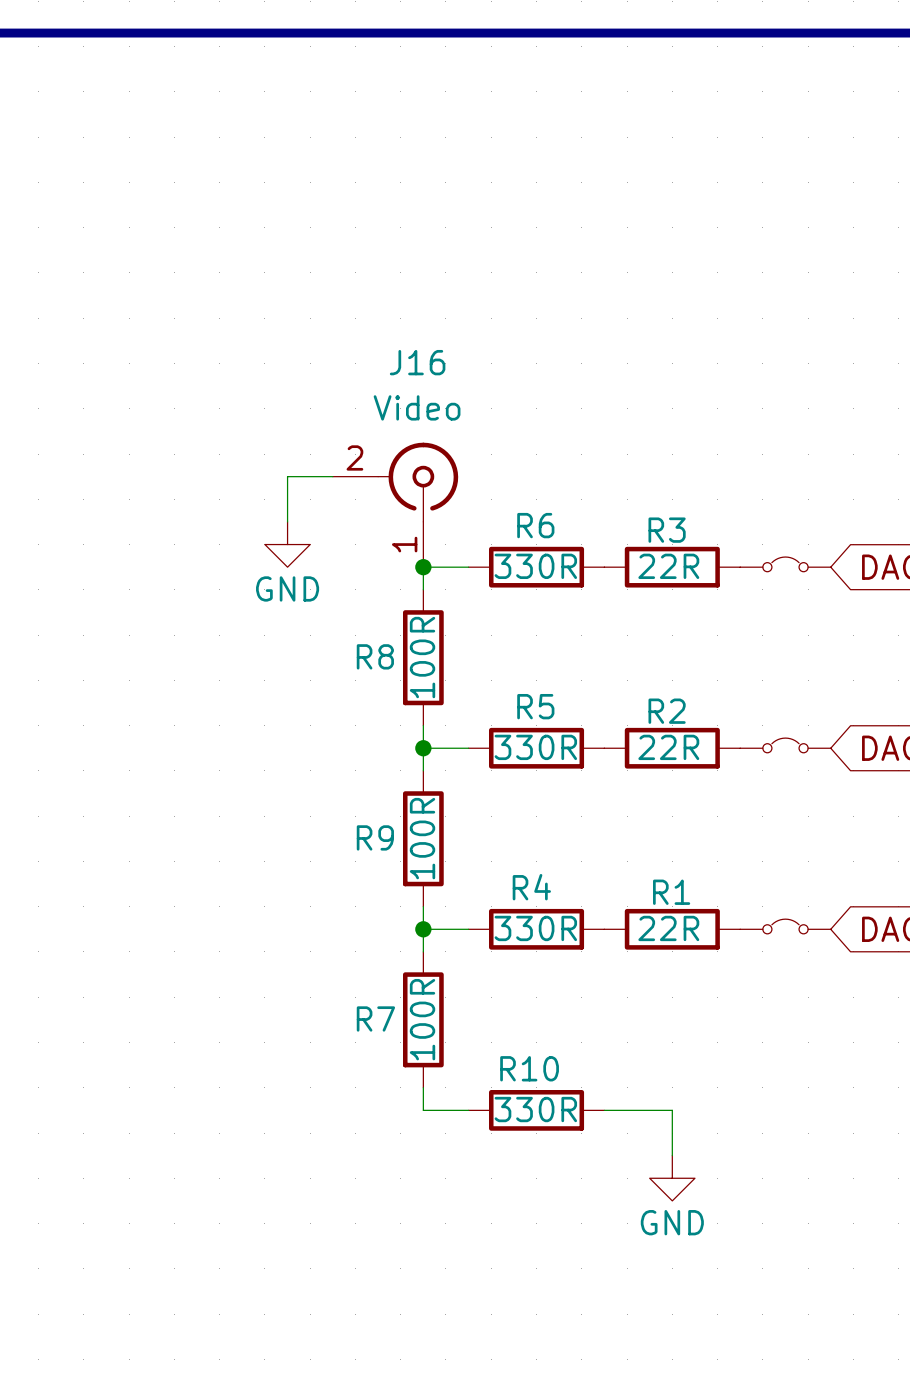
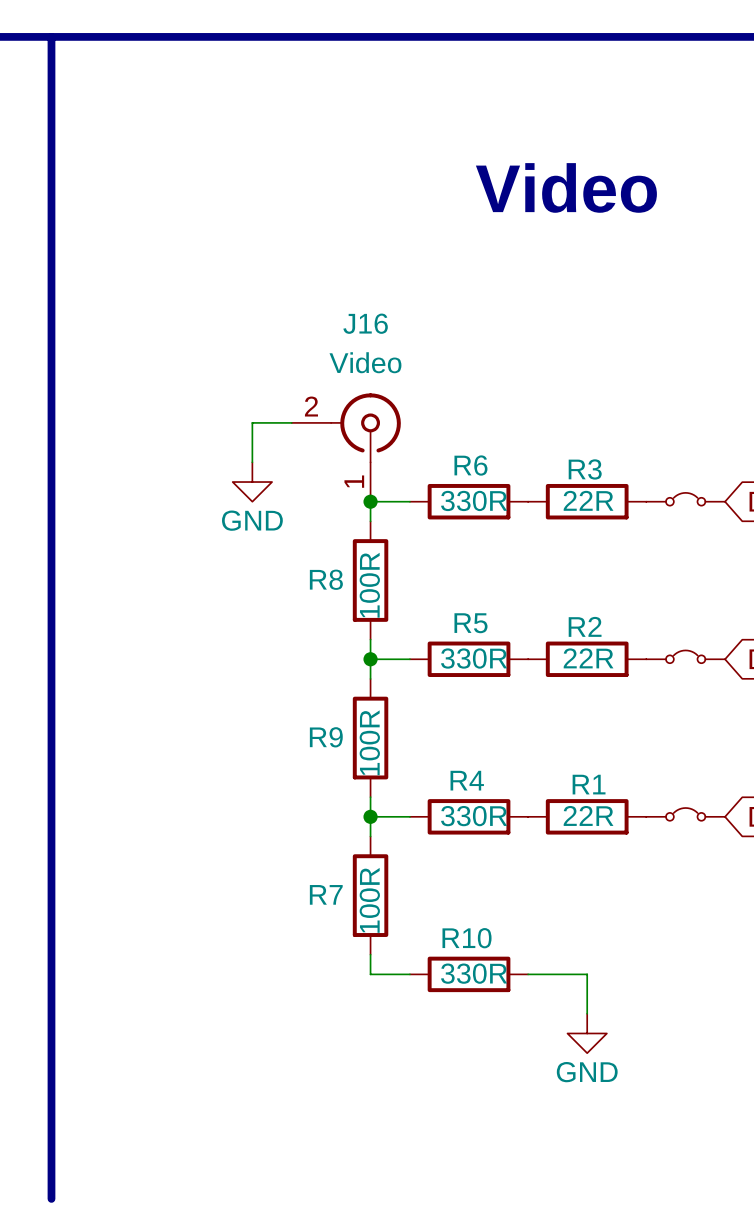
line: none -> (51, 36) (51, 1198)
text: none -> Video (566, 187)

